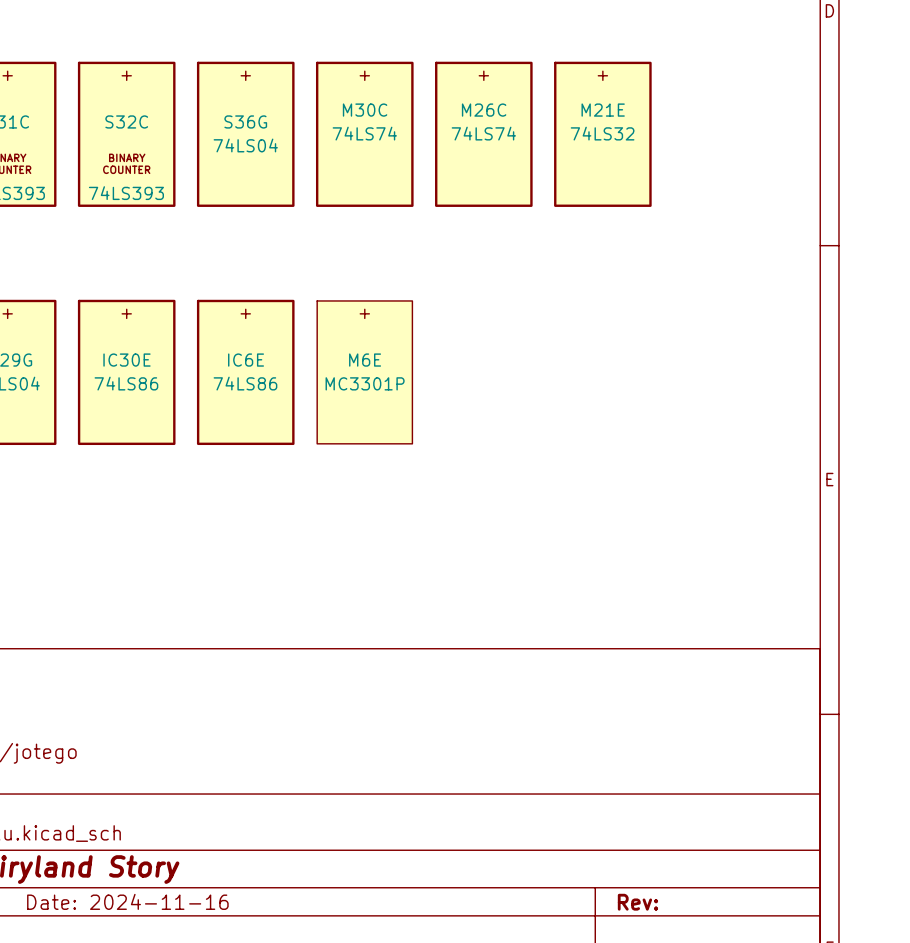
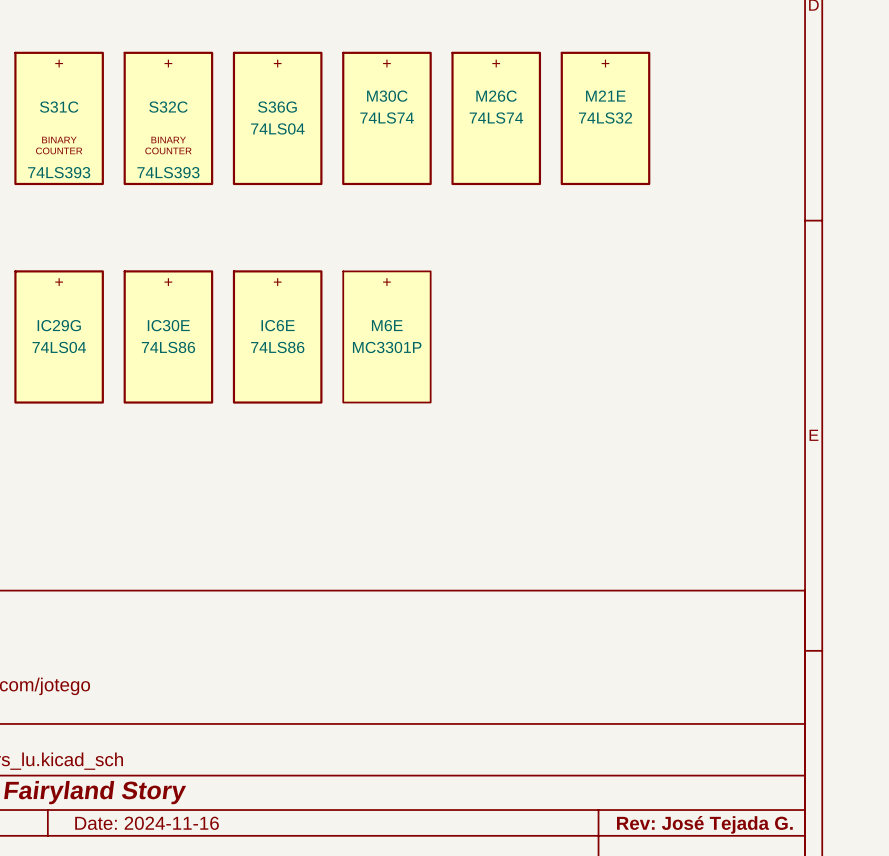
title block: Rev: (637, 902) -> Rev: José Tejada G. (704, 824)

